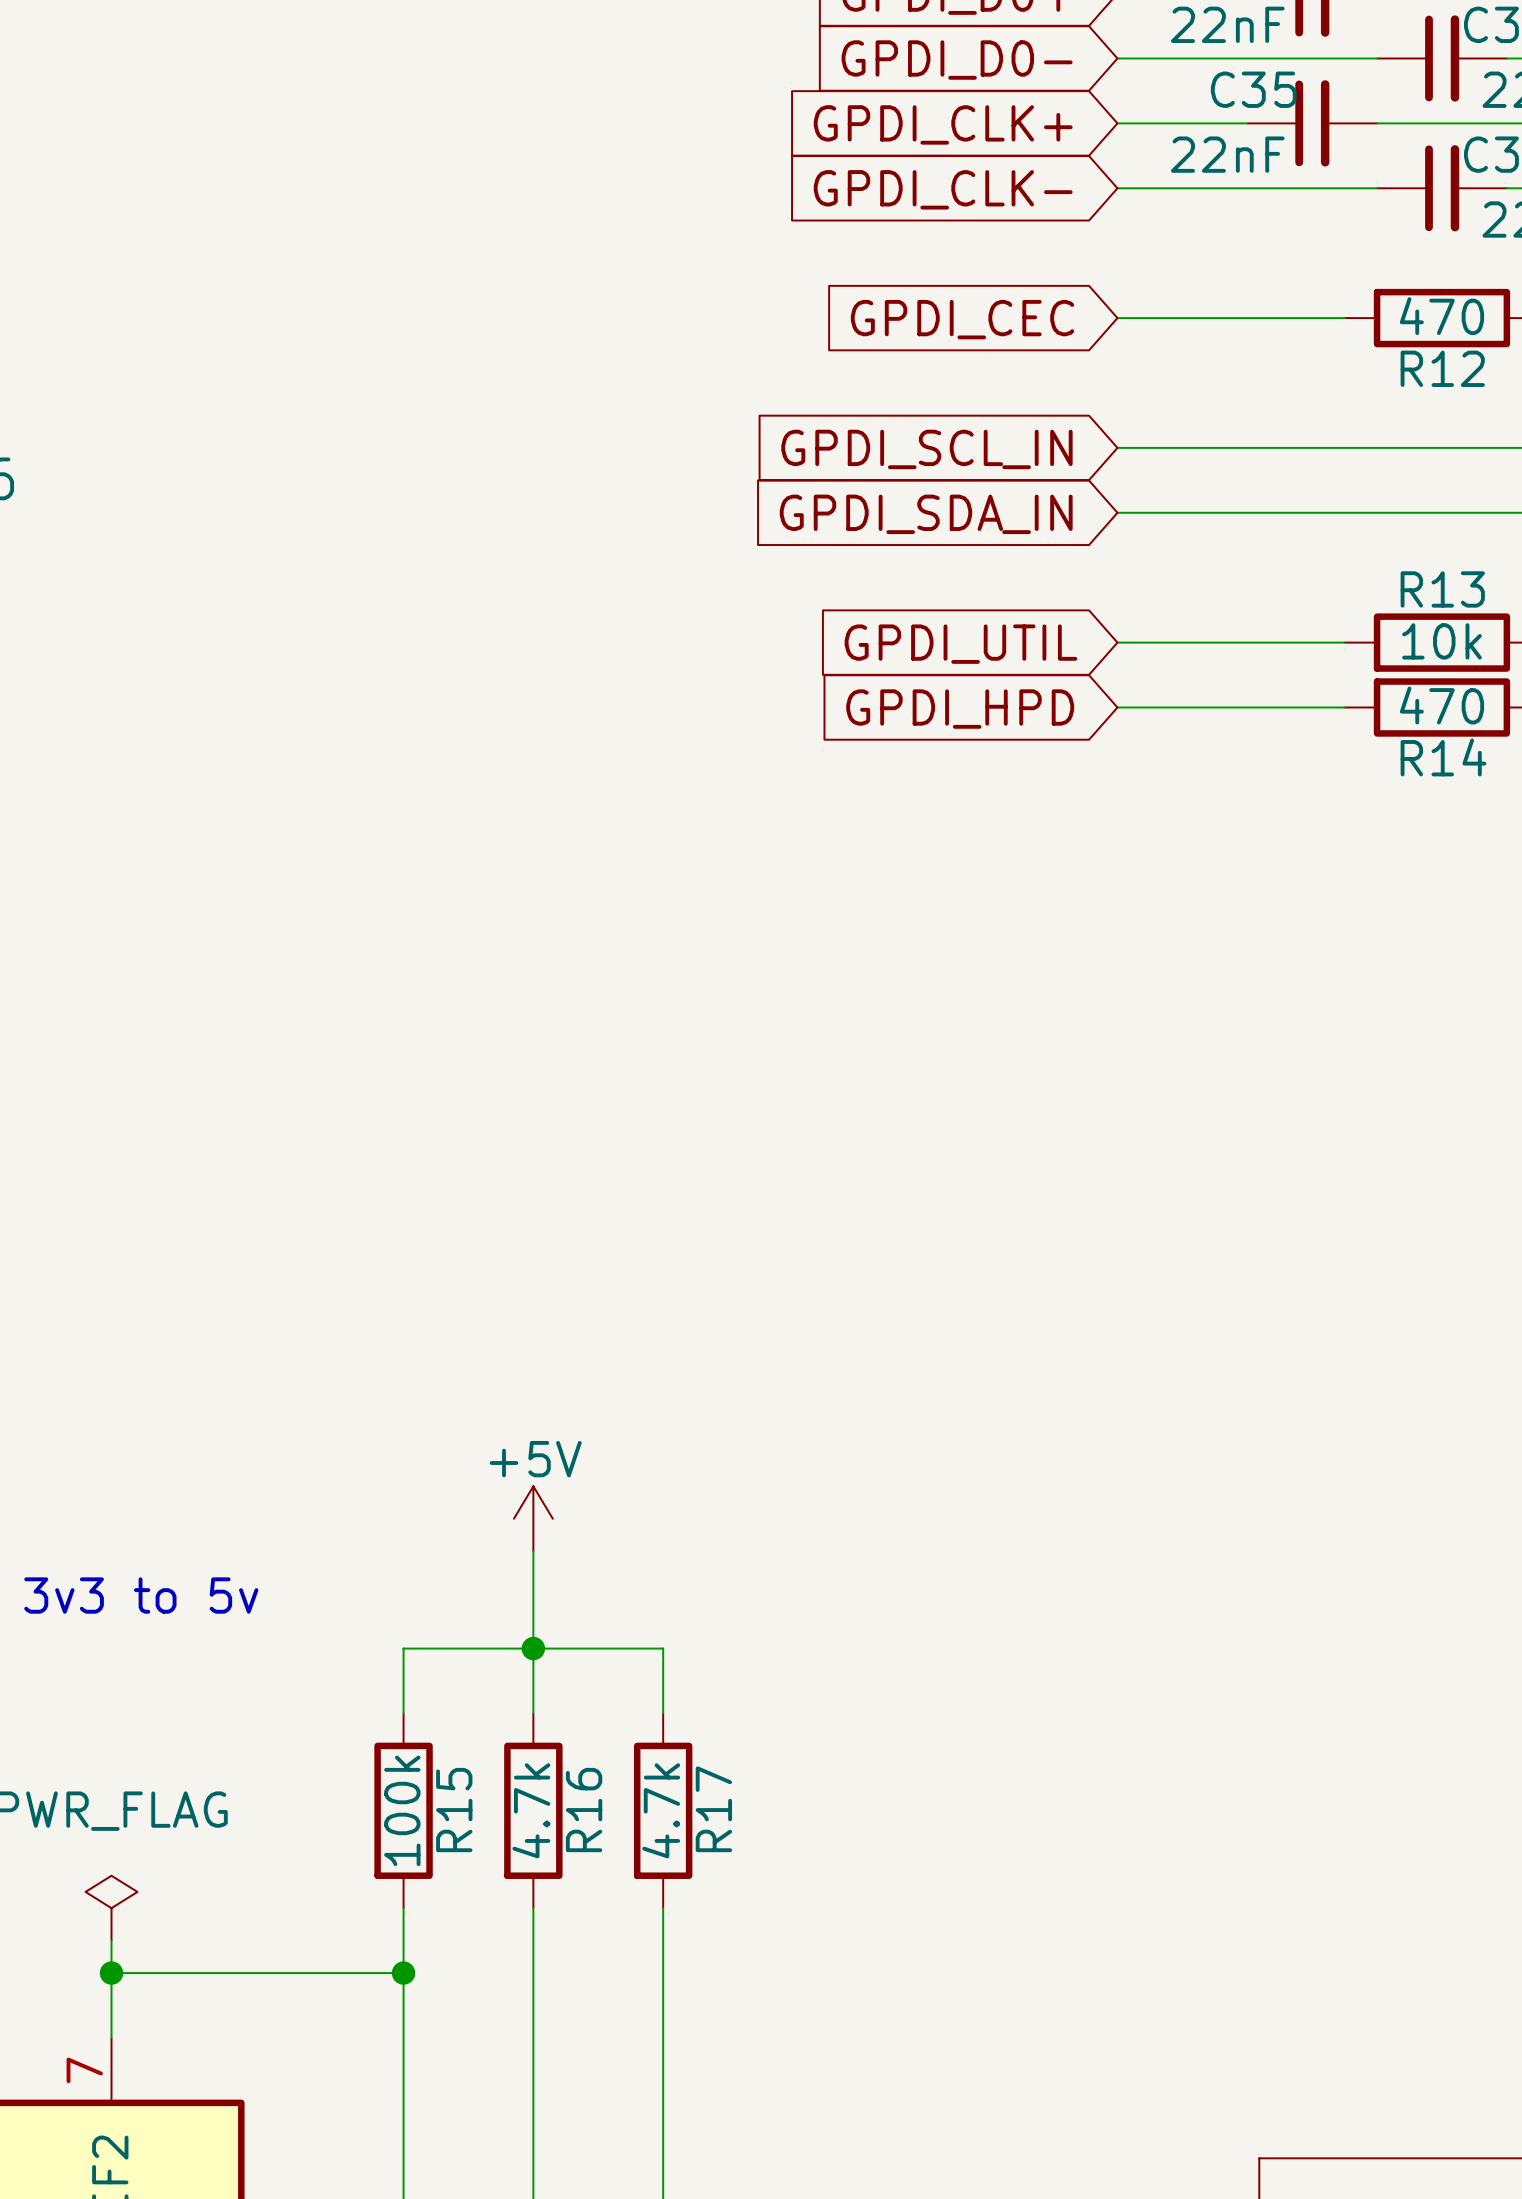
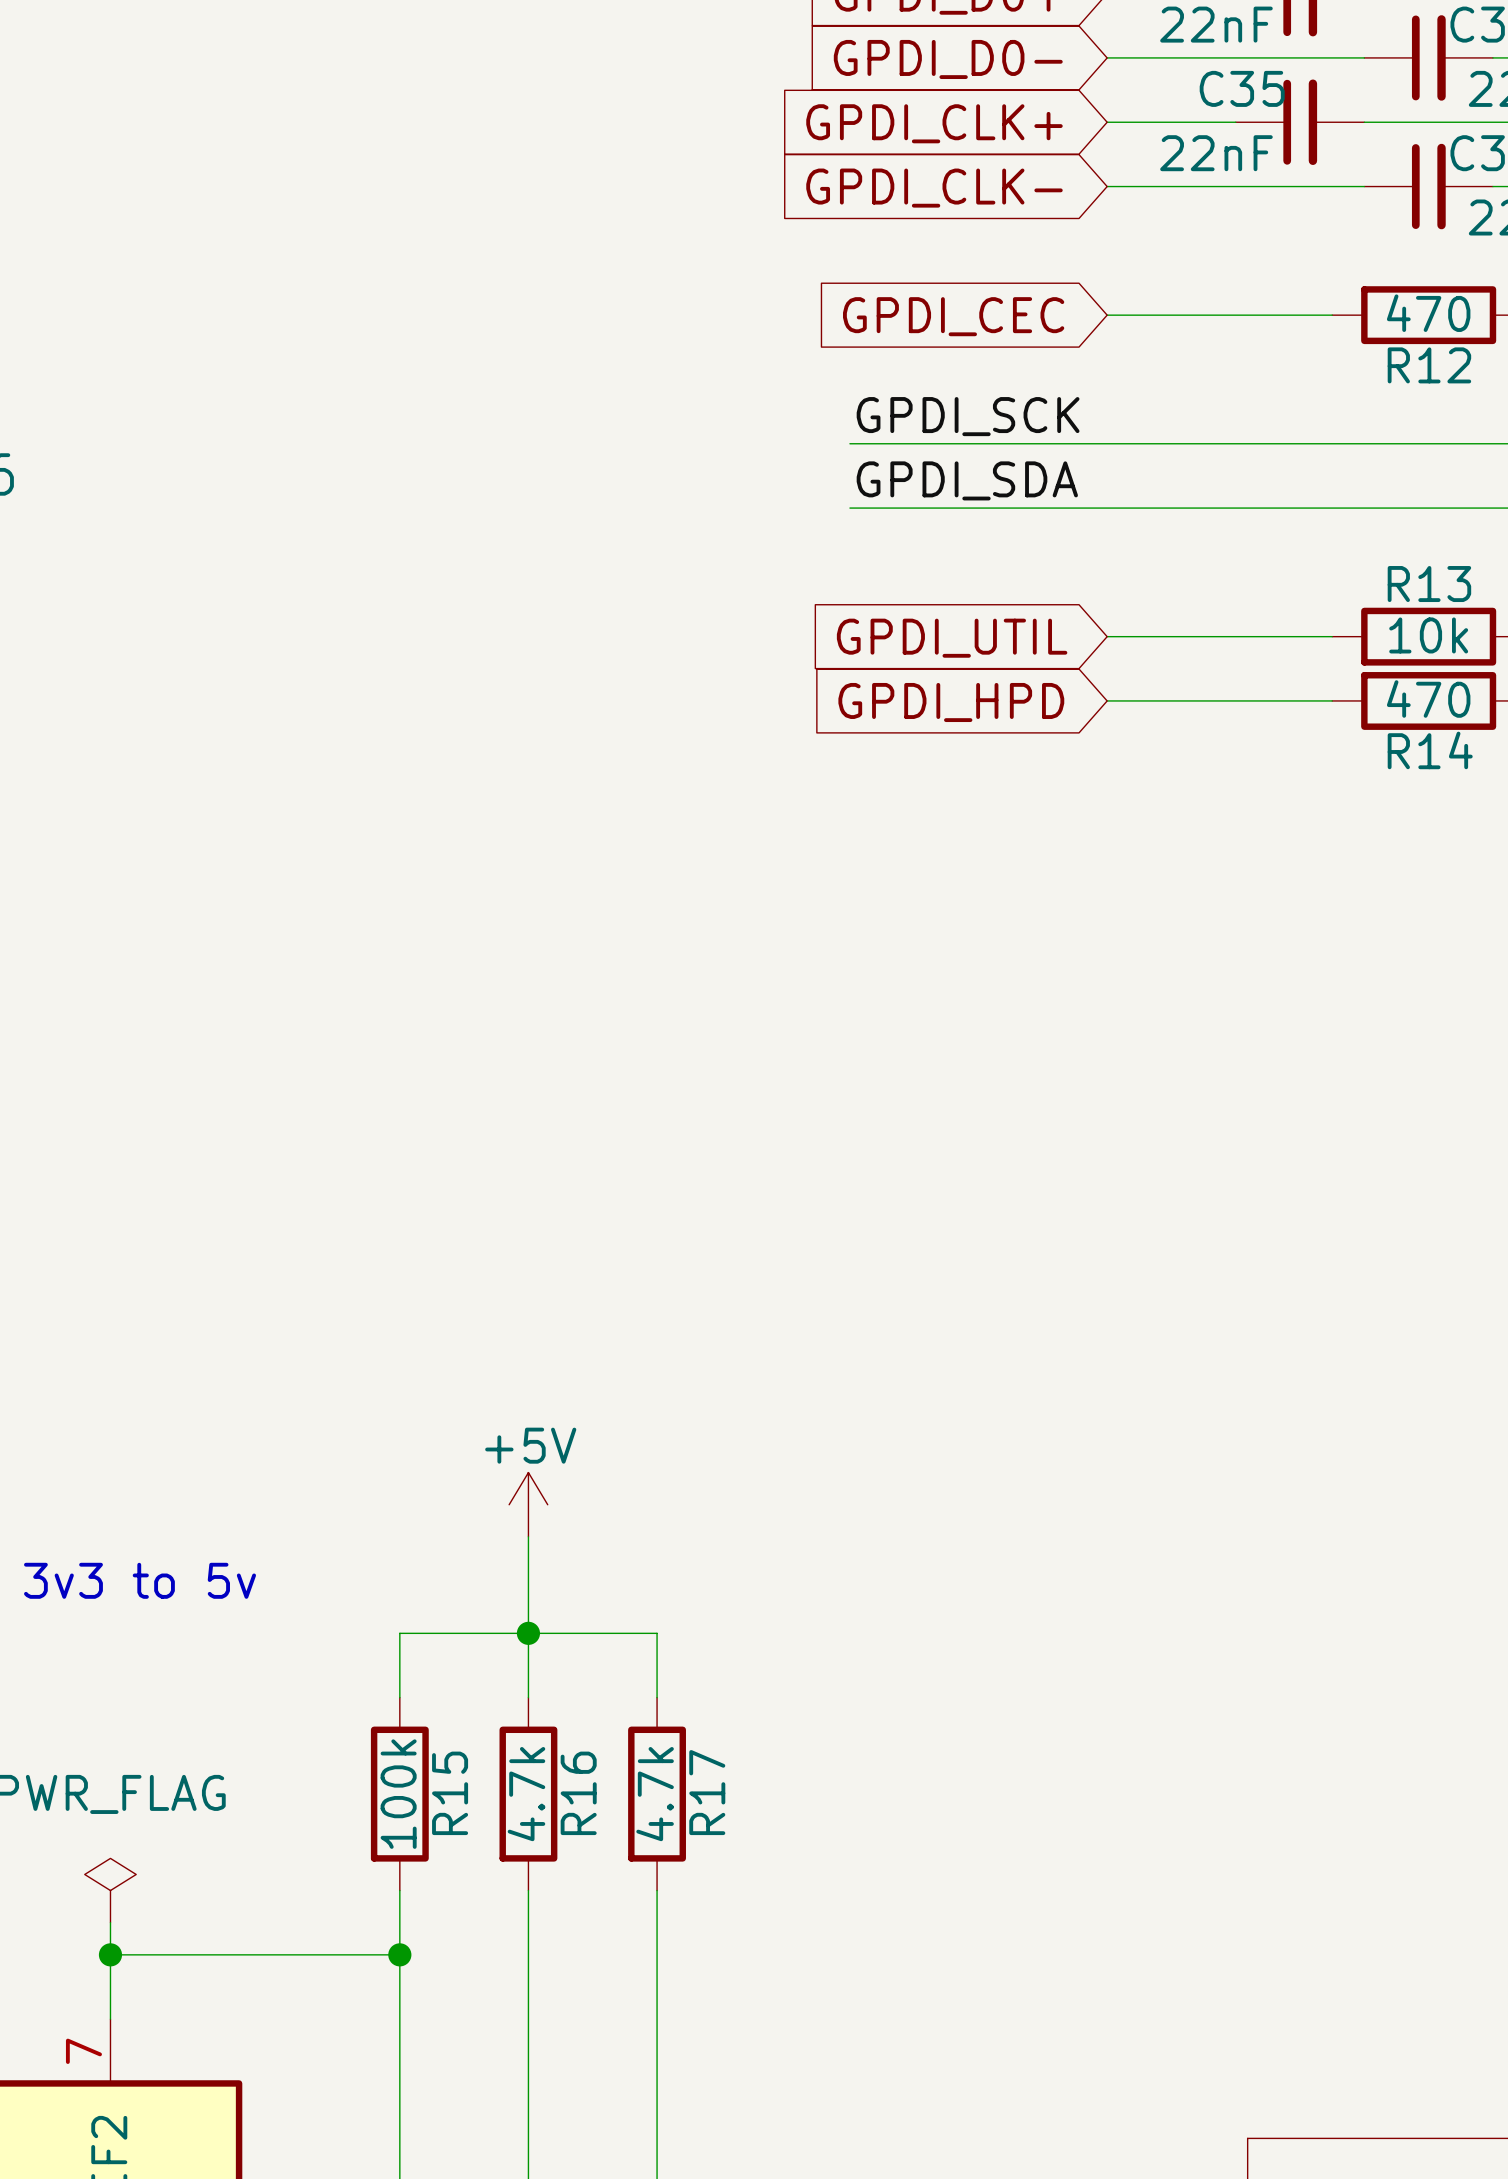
label: none -> GPDI_SCK (968, 416)
wire: none -> (849, 443) (1107, 443)
global label: GPDI_SCL_IN (926, 449) -> none
label: none -> GPDI_SDA (967, 480)
wire: none -> (849, 508) (1107, 508)
global label: GPDI_SDA_IN (926, 514) -> none

